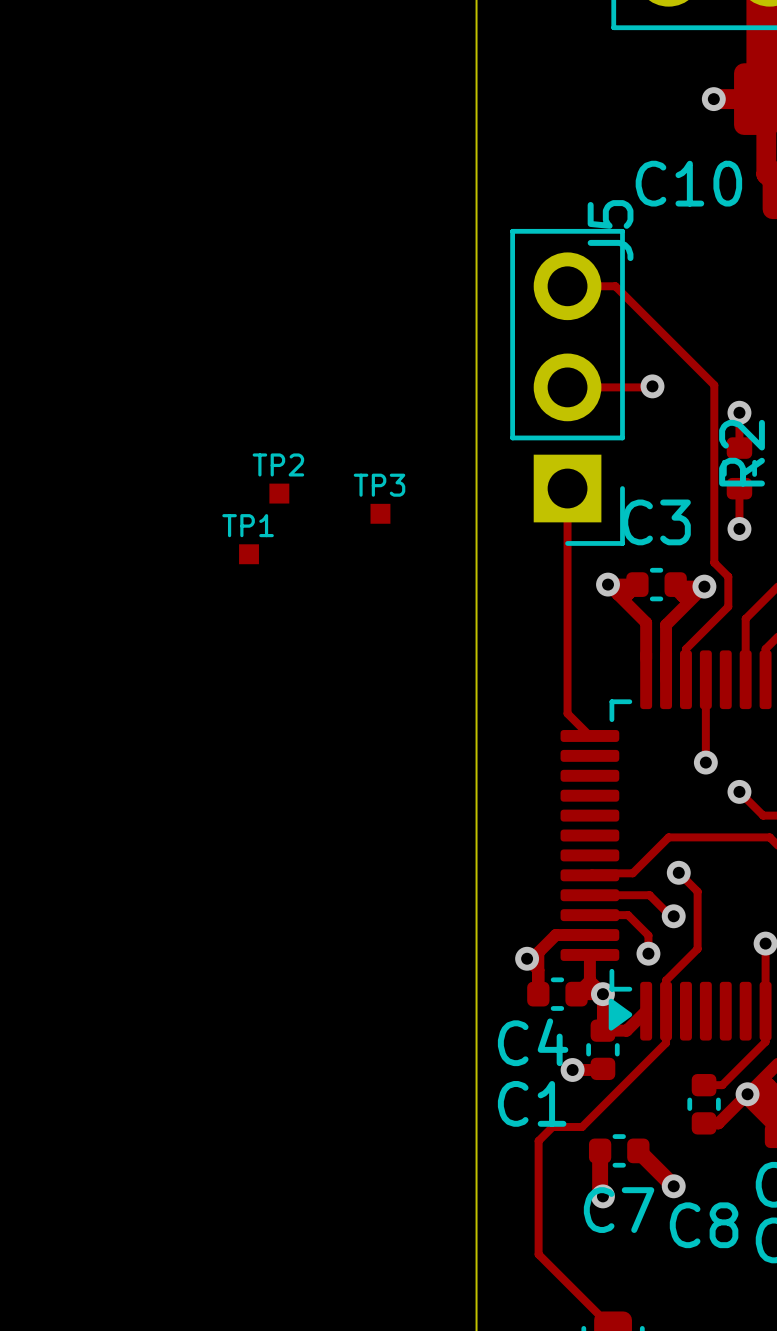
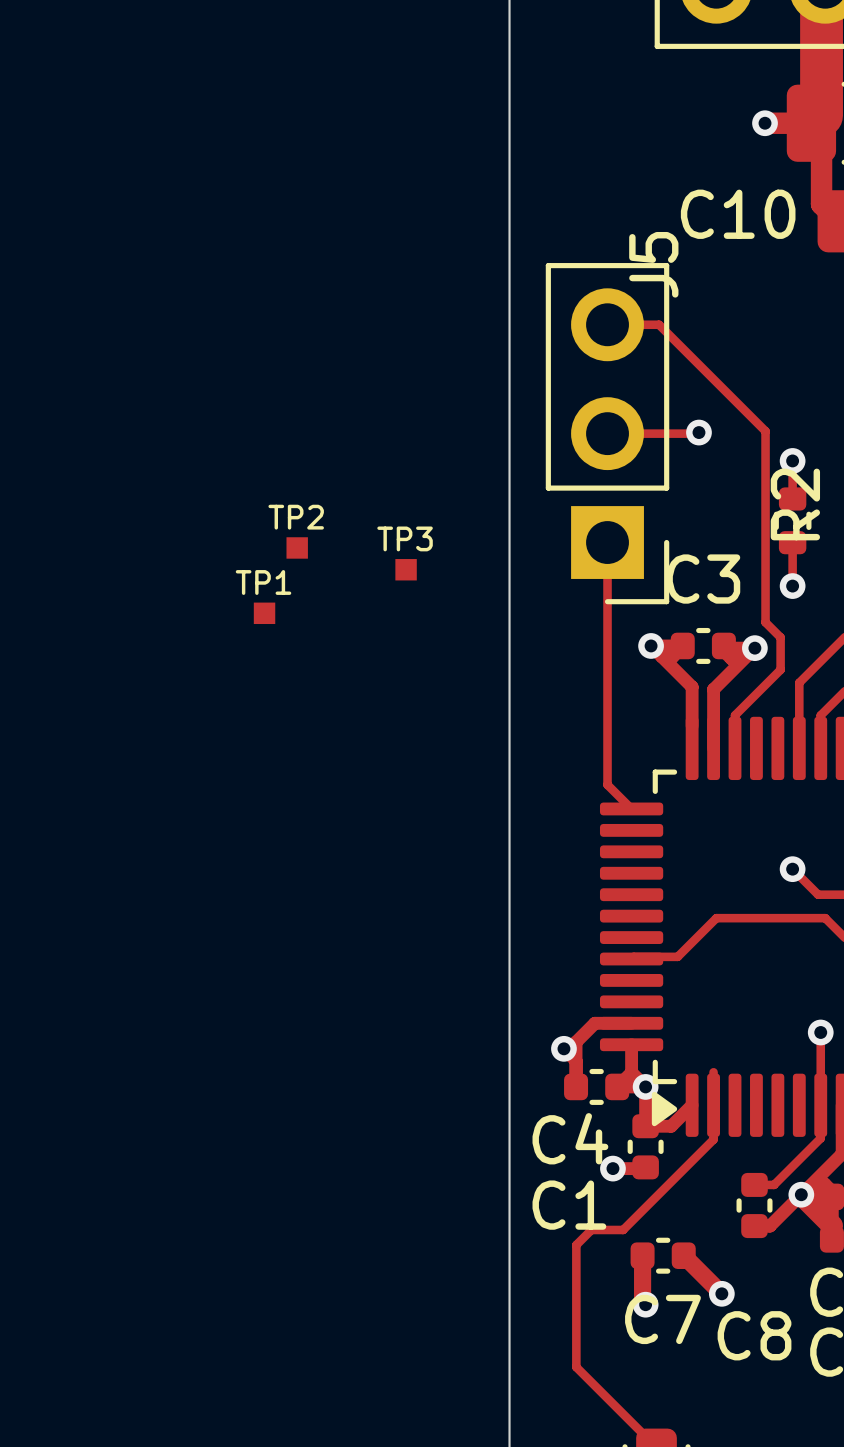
track: (705, 679) (705, 762) -> none
via: (705, 762) -> none
track: (678, 872) (697, 891) (697, 948) (666, 980) -> none
via: (678, 872) -> none
track: (589, 895) (649, 895) (670, 916) (673, 916) -> none
track: (589, 915) (628, 915) (648, 935) (648, 953) -> none
via: (673, 916) -> none
via: (648, 953) -> none

